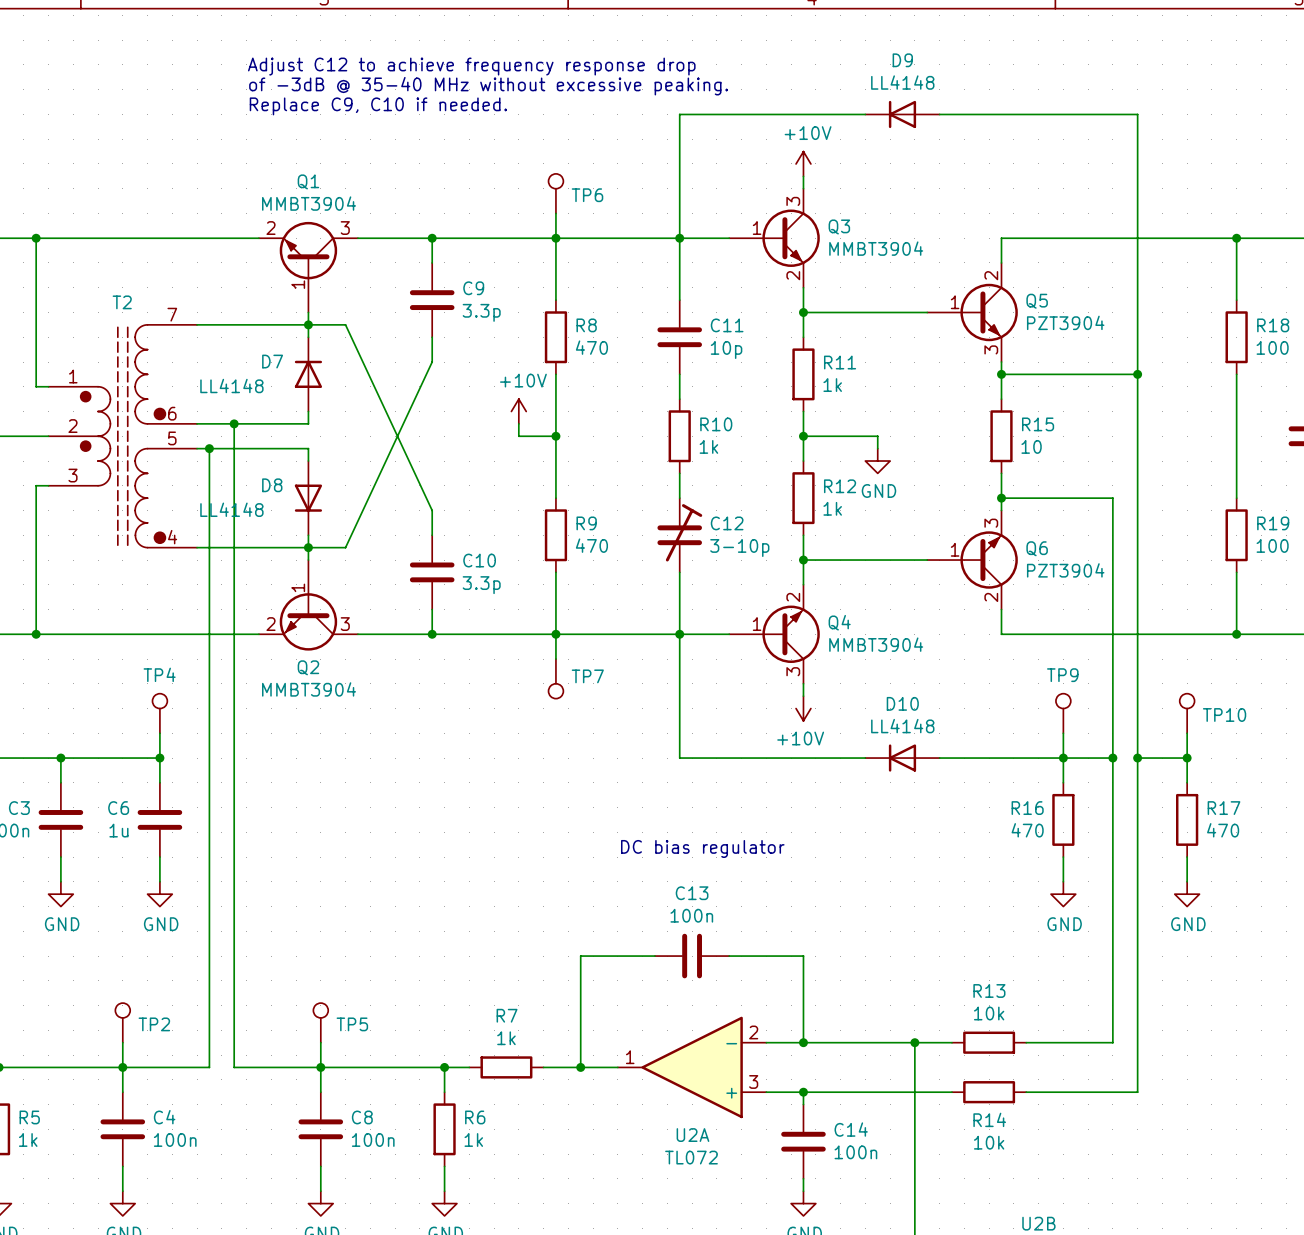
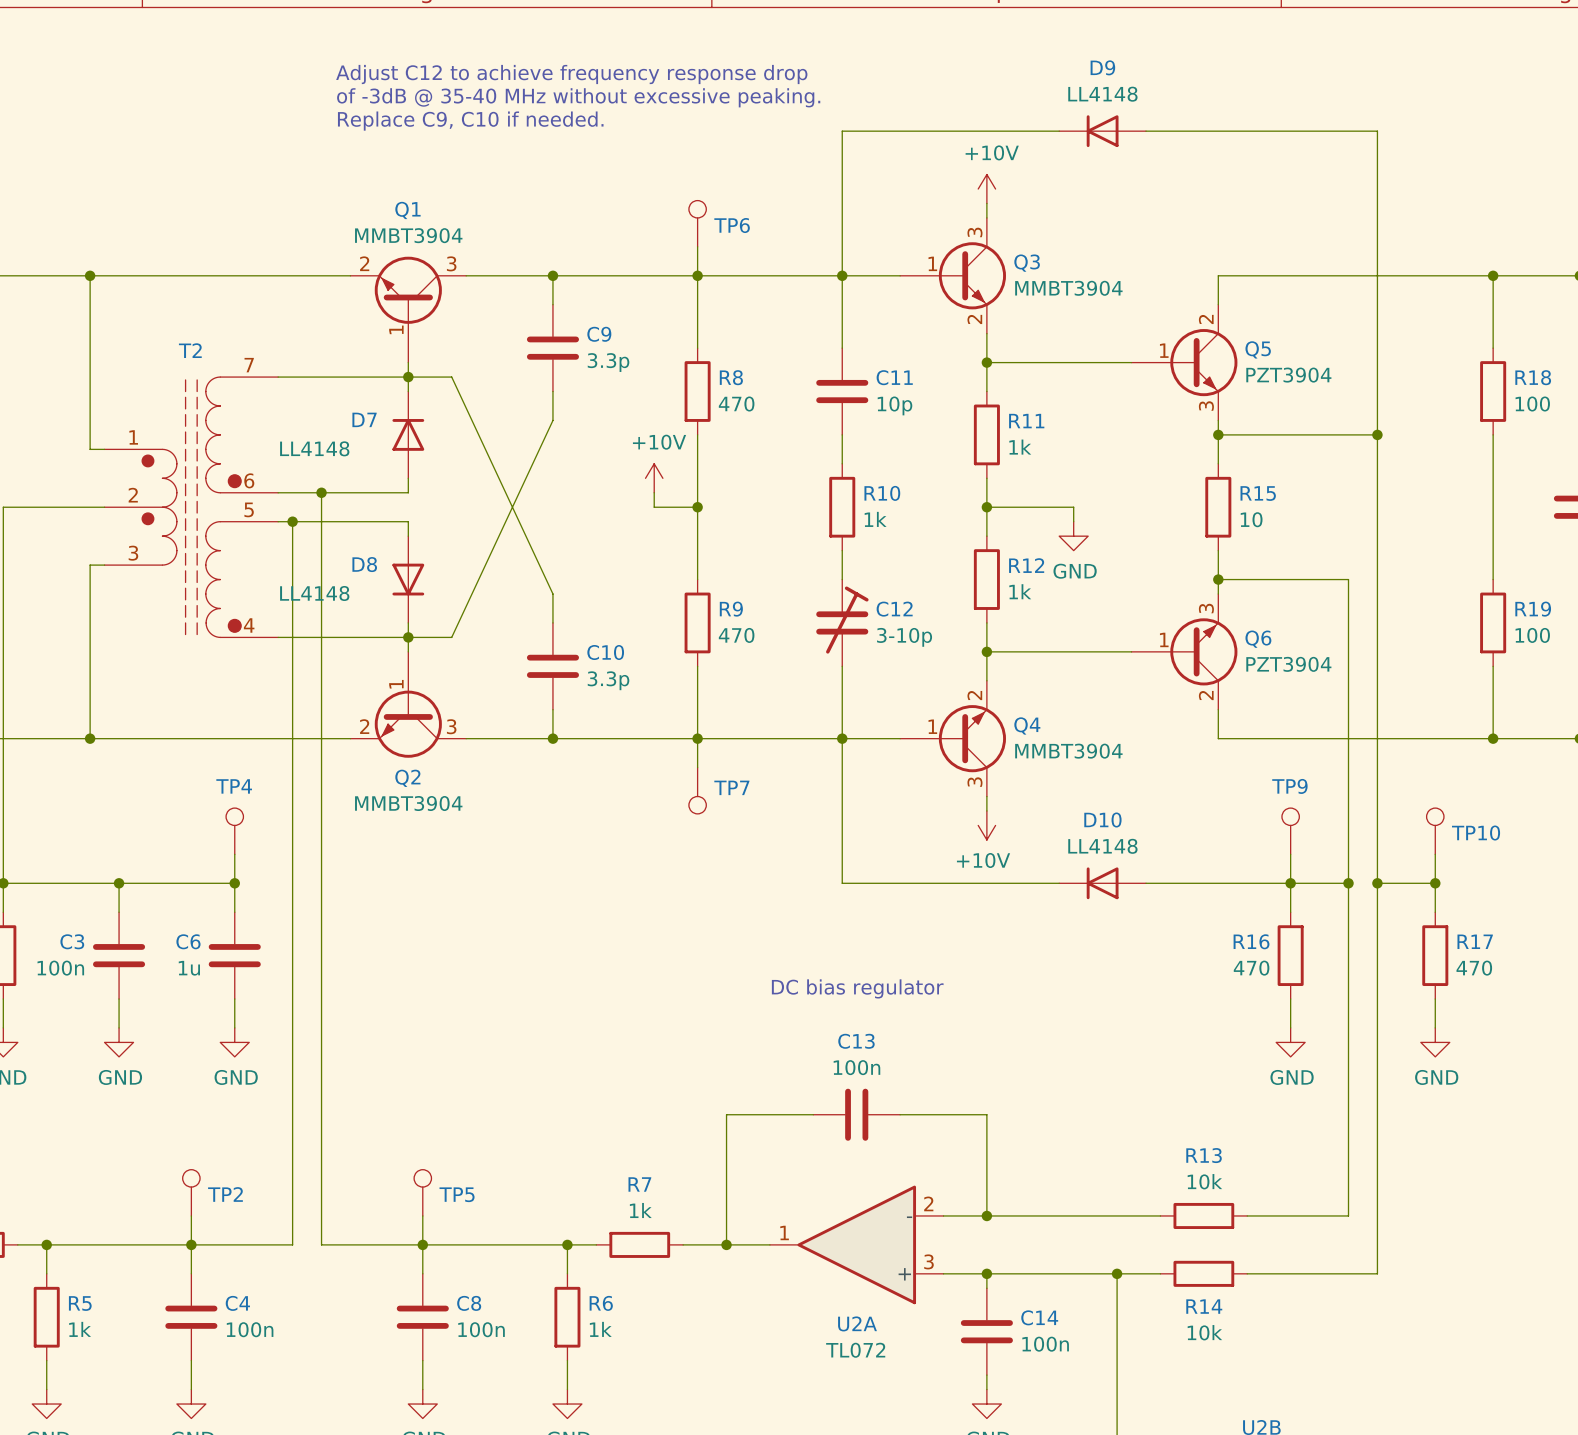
wire: (914, 1042) (914, 1092) -> none
junction position: (914, 1042) -> (1117, 1273)

